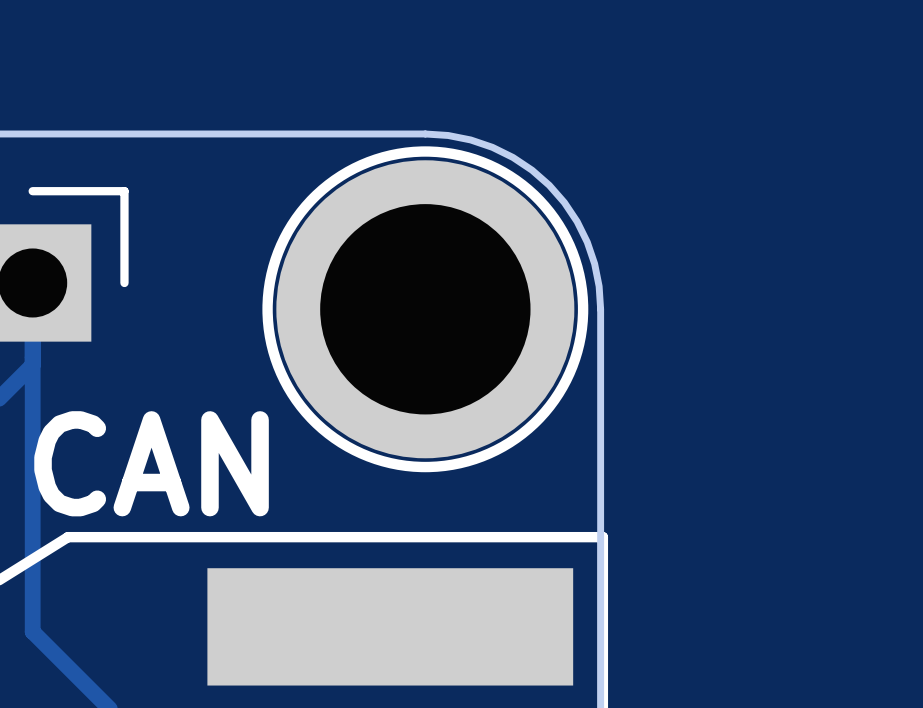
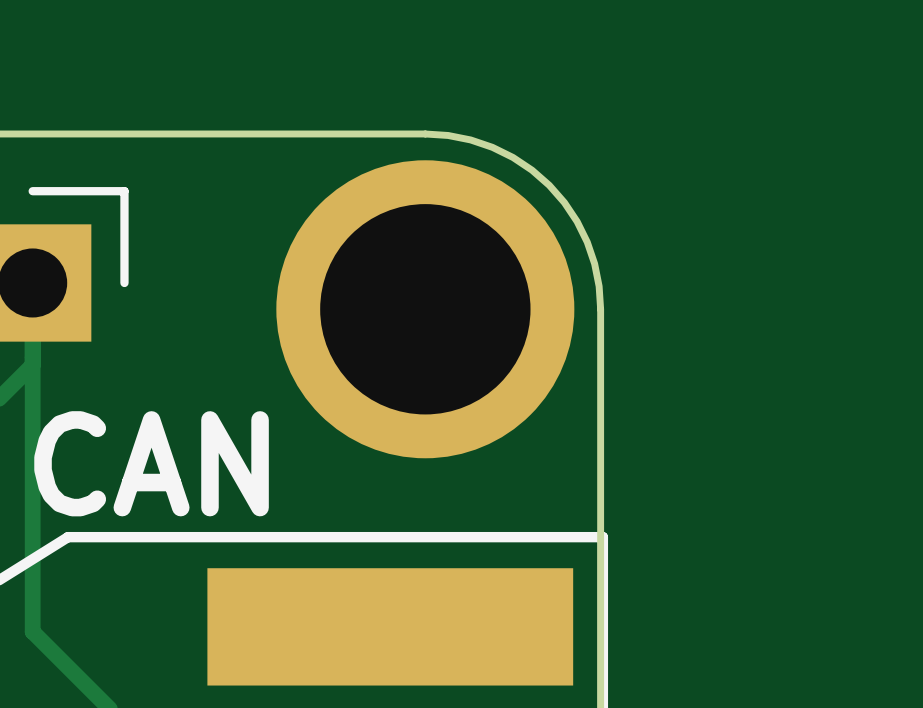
part footprint: [262, 146, 589, 473] -> [276, 160, 575, 459]

